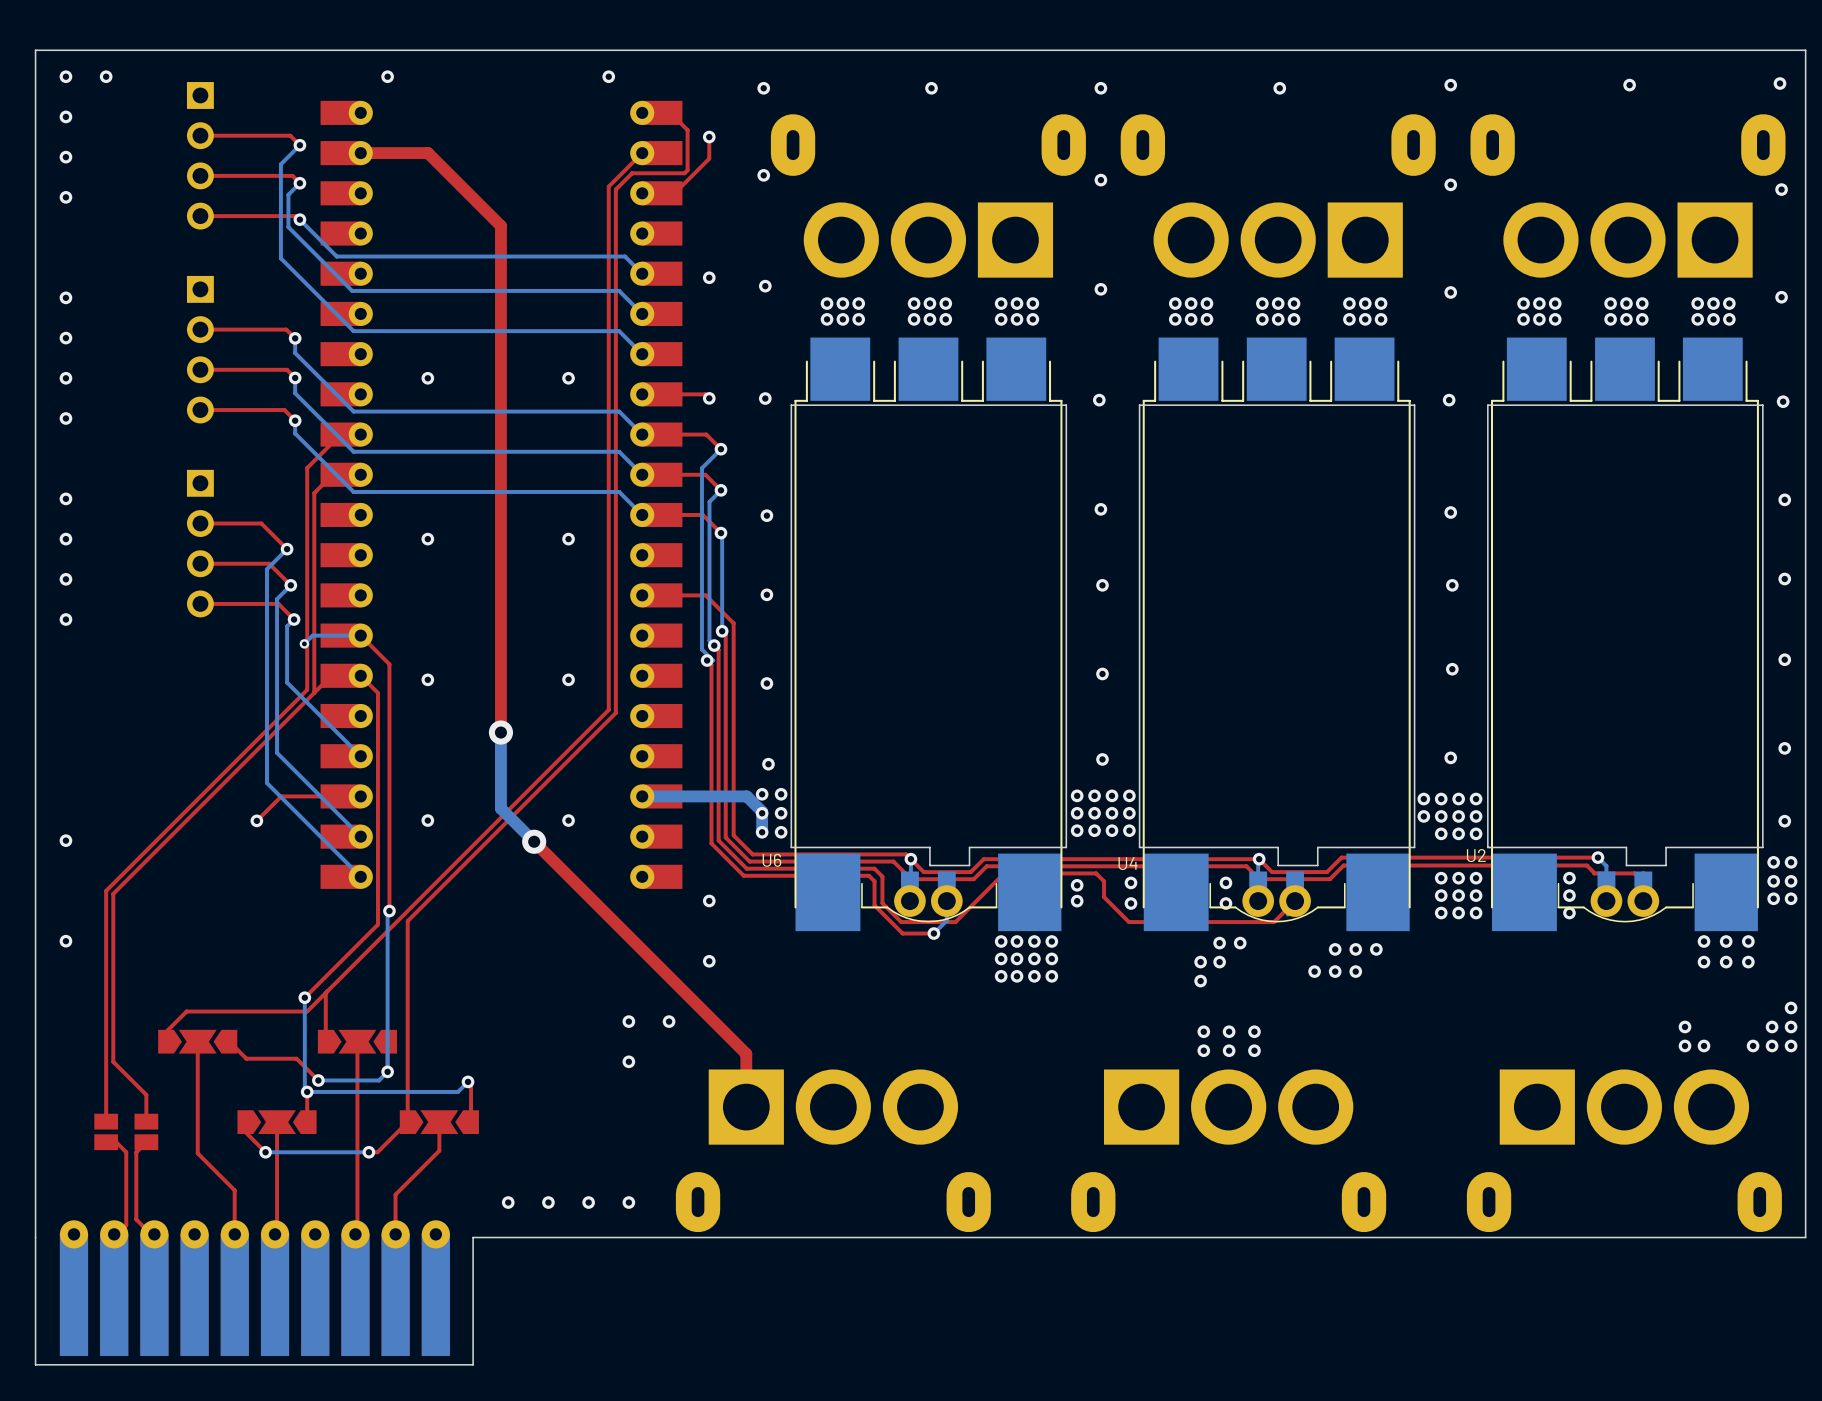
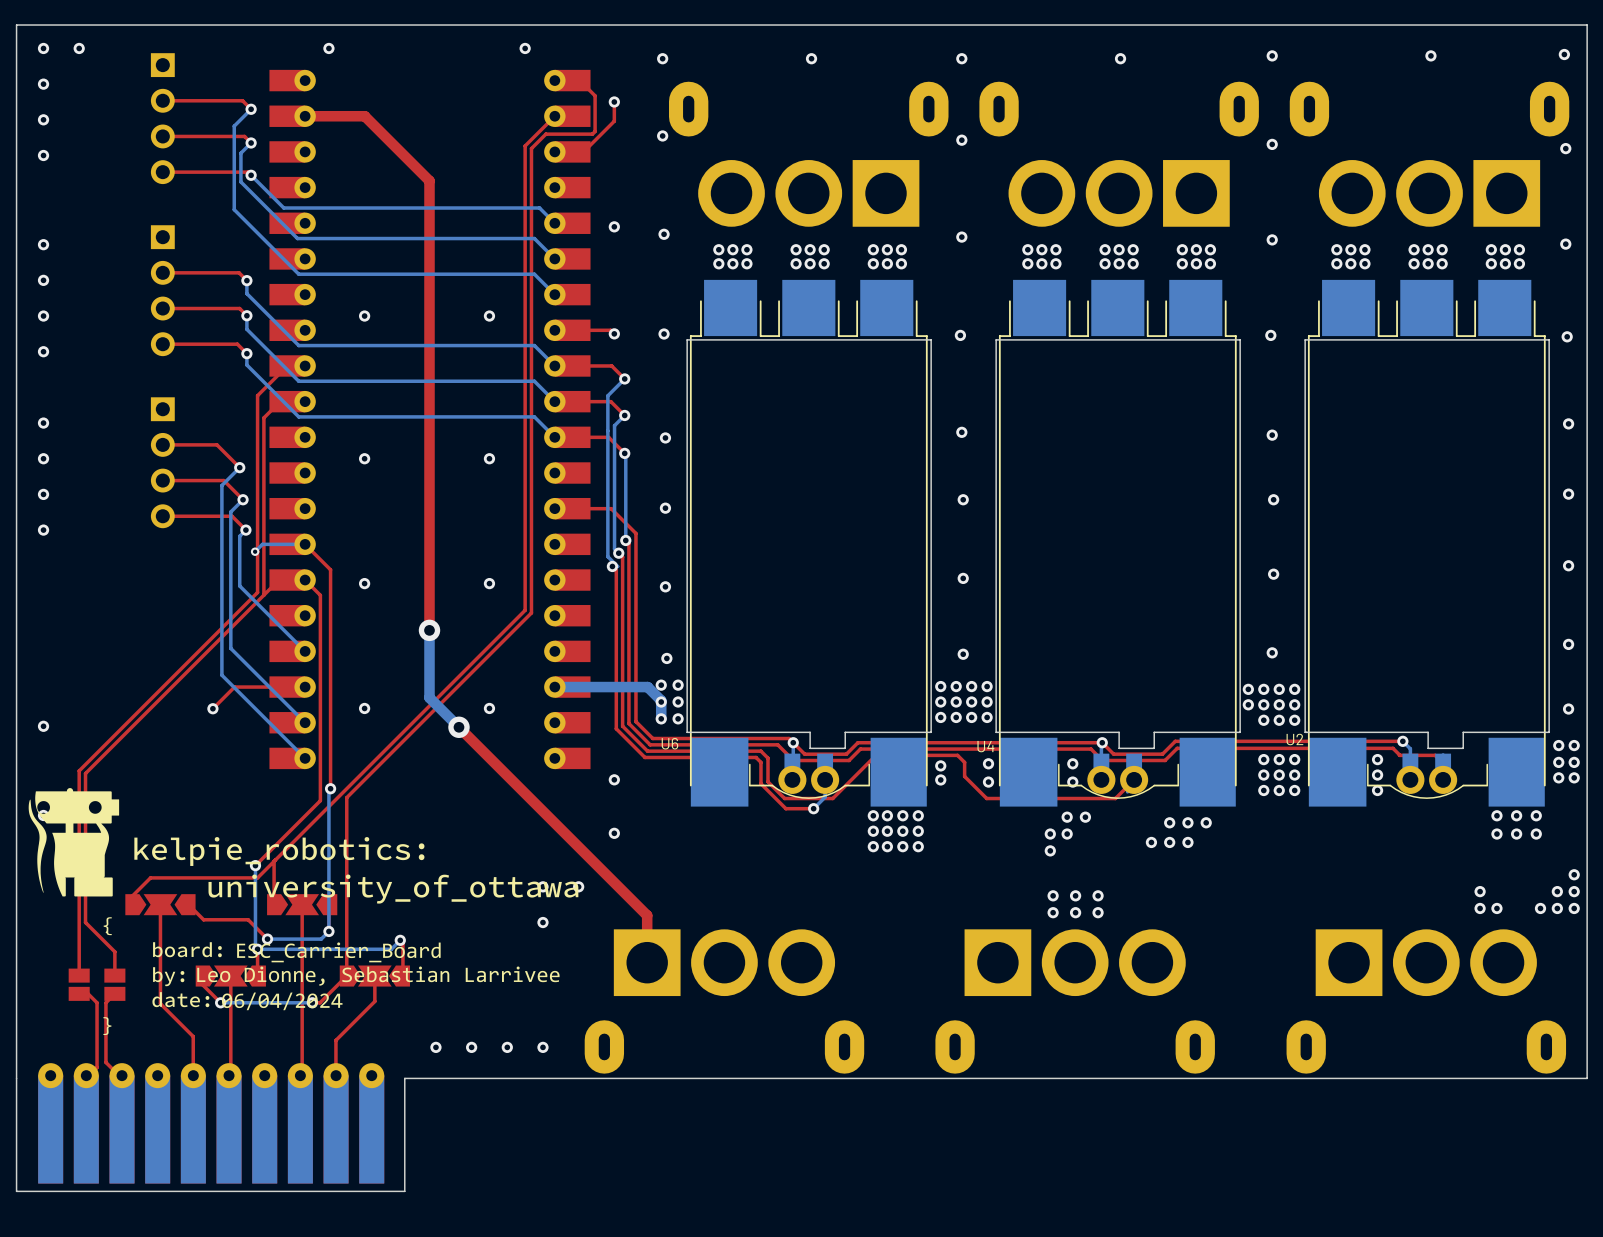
drawing: none -> [28, 788, 579, 904]
drawing: none -> [103, 917, 112, 936]
drawing: none -> [152, 942, 560, 1011]
drawing: none -> [103, 1017, 112, 1036]

